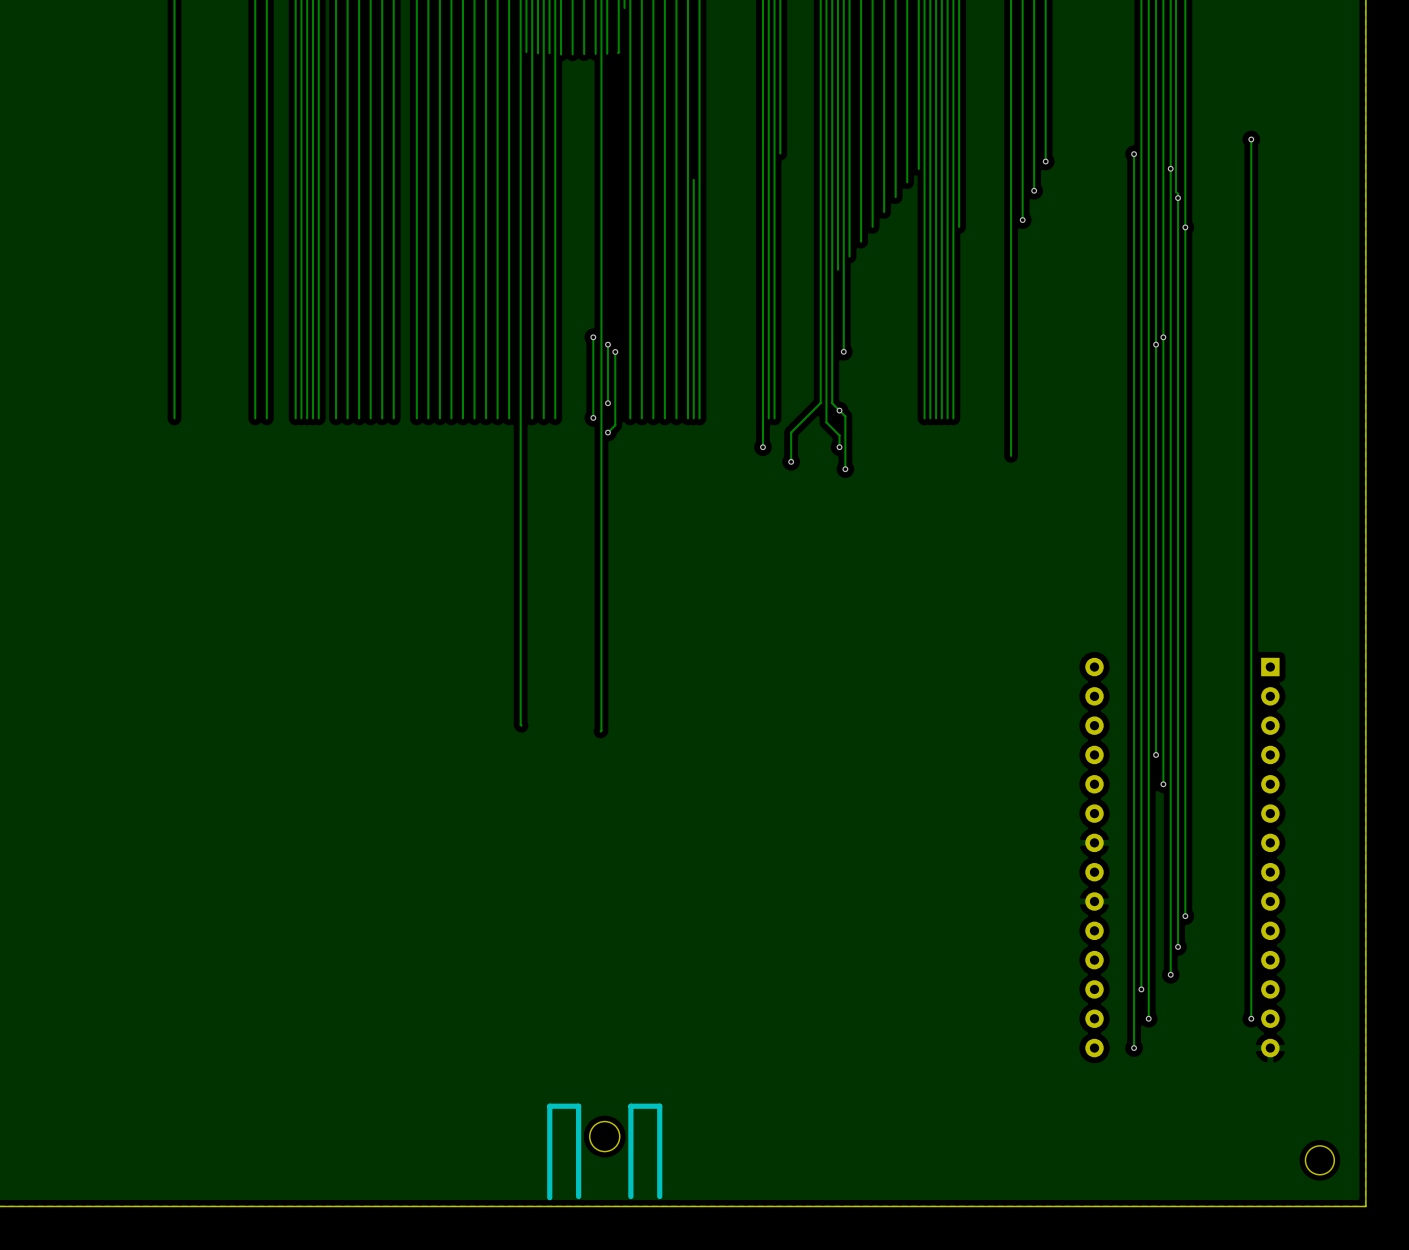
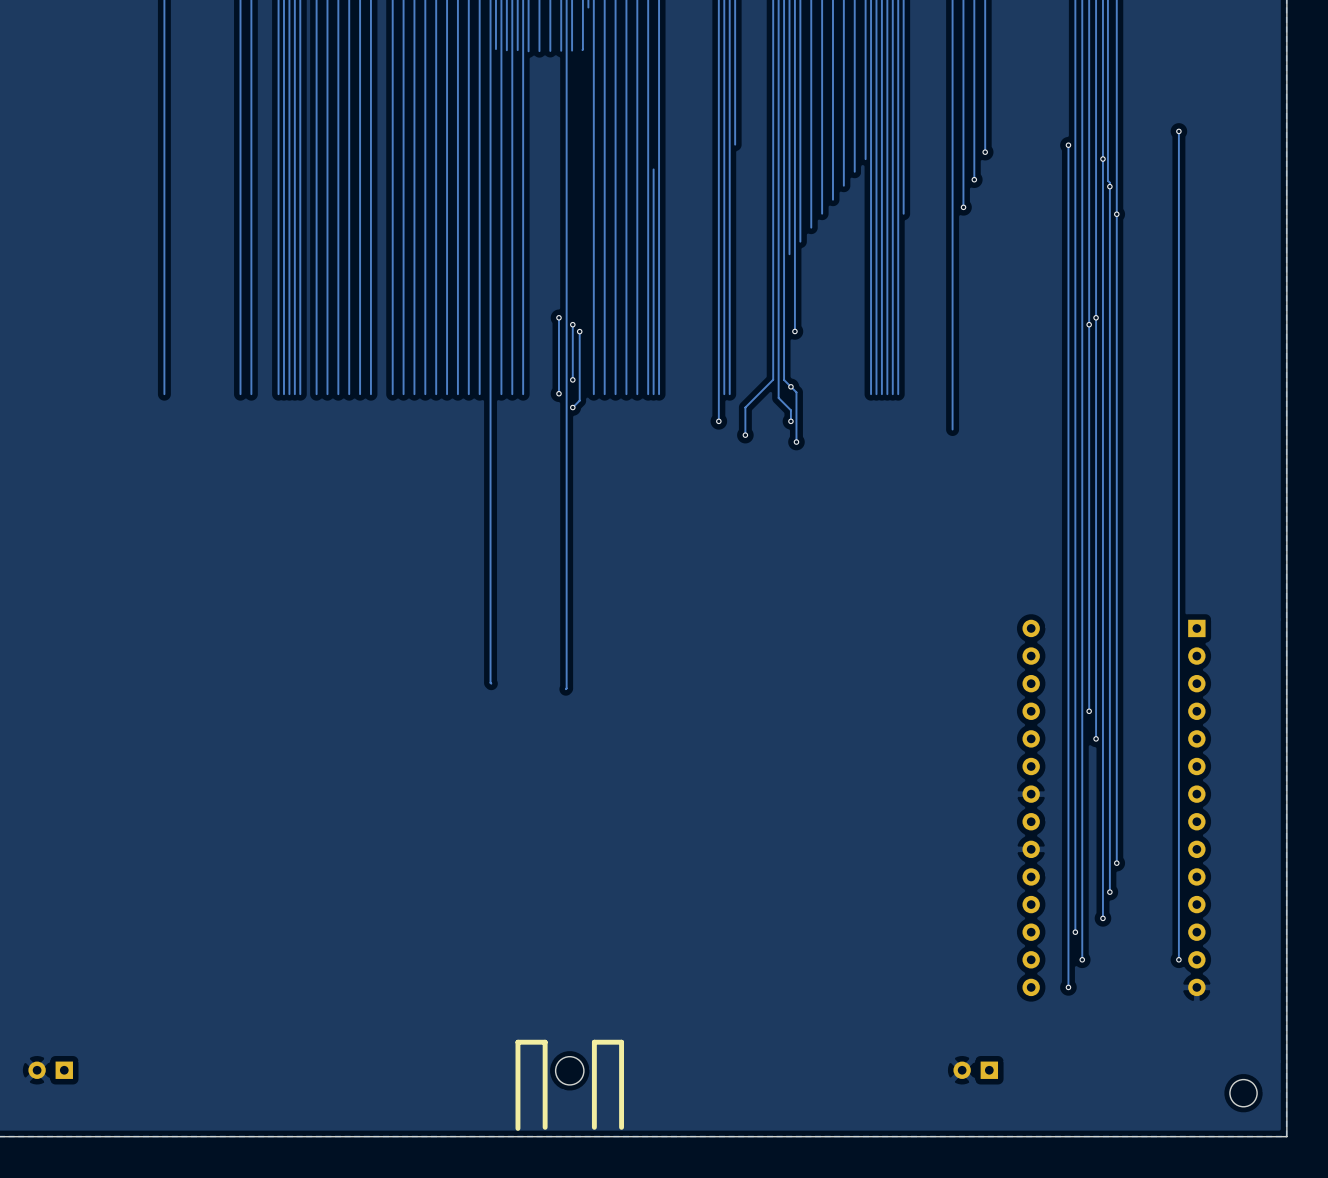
part: none -> (50, 1070)
part: none -> (975, 1070)

